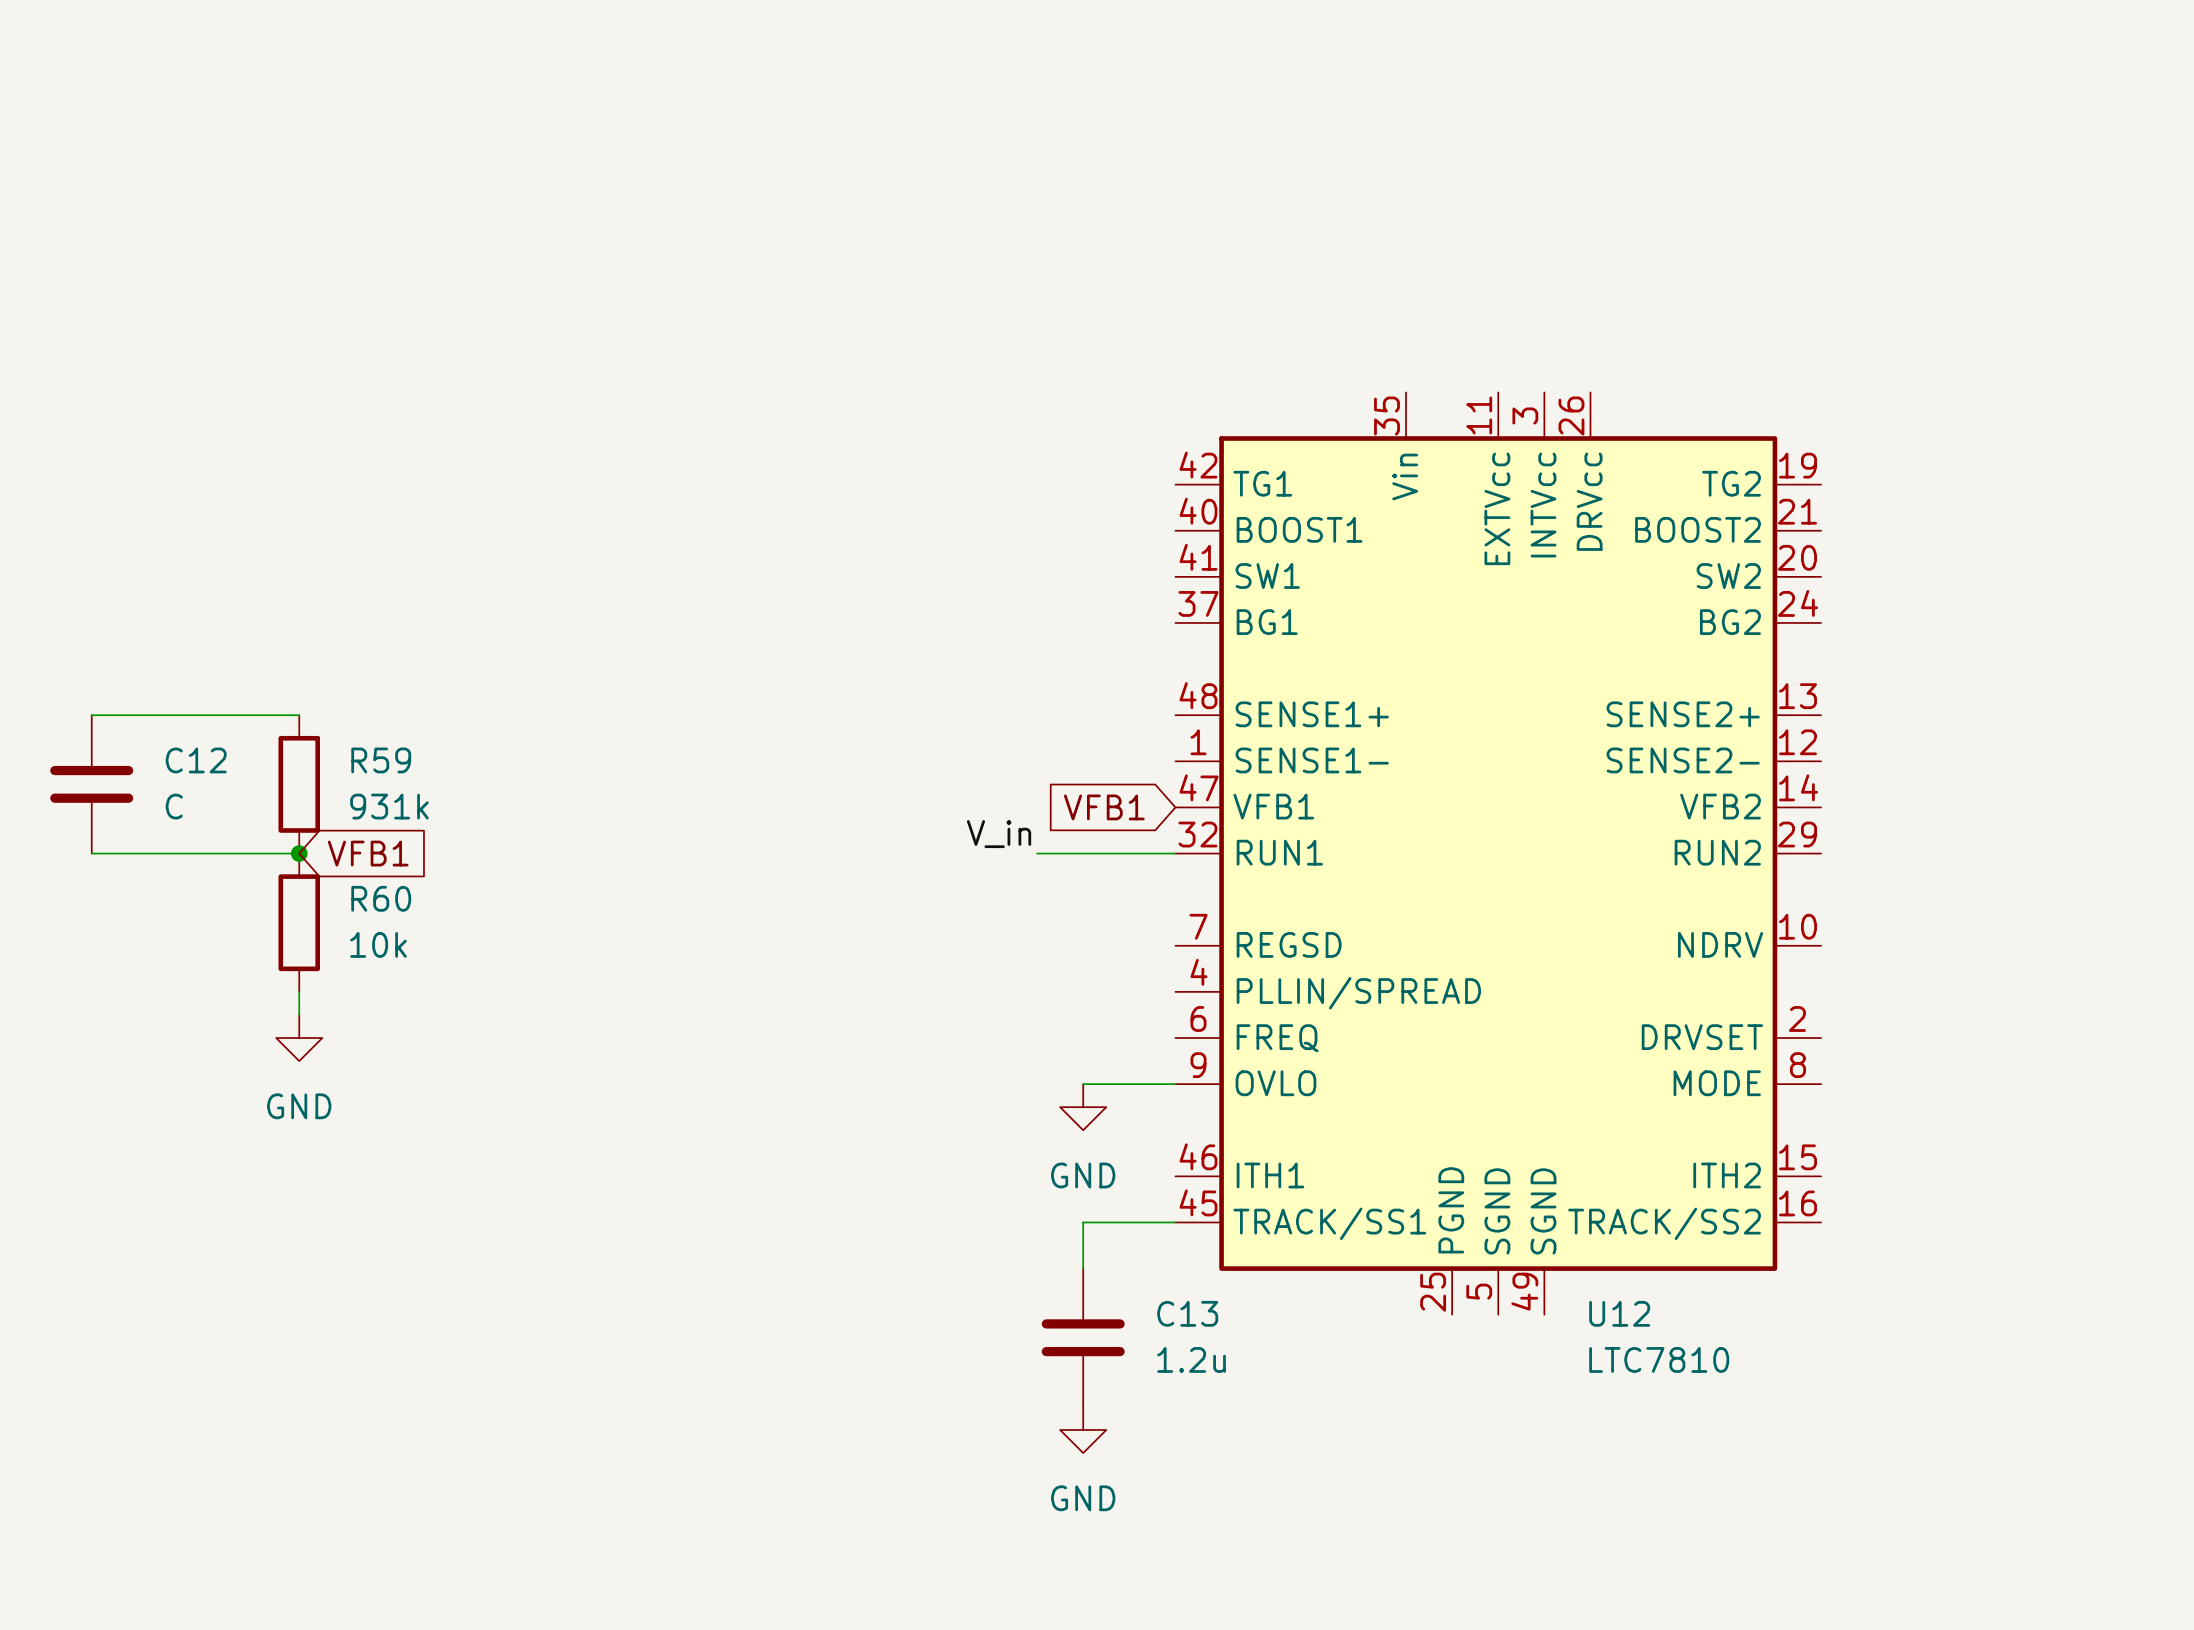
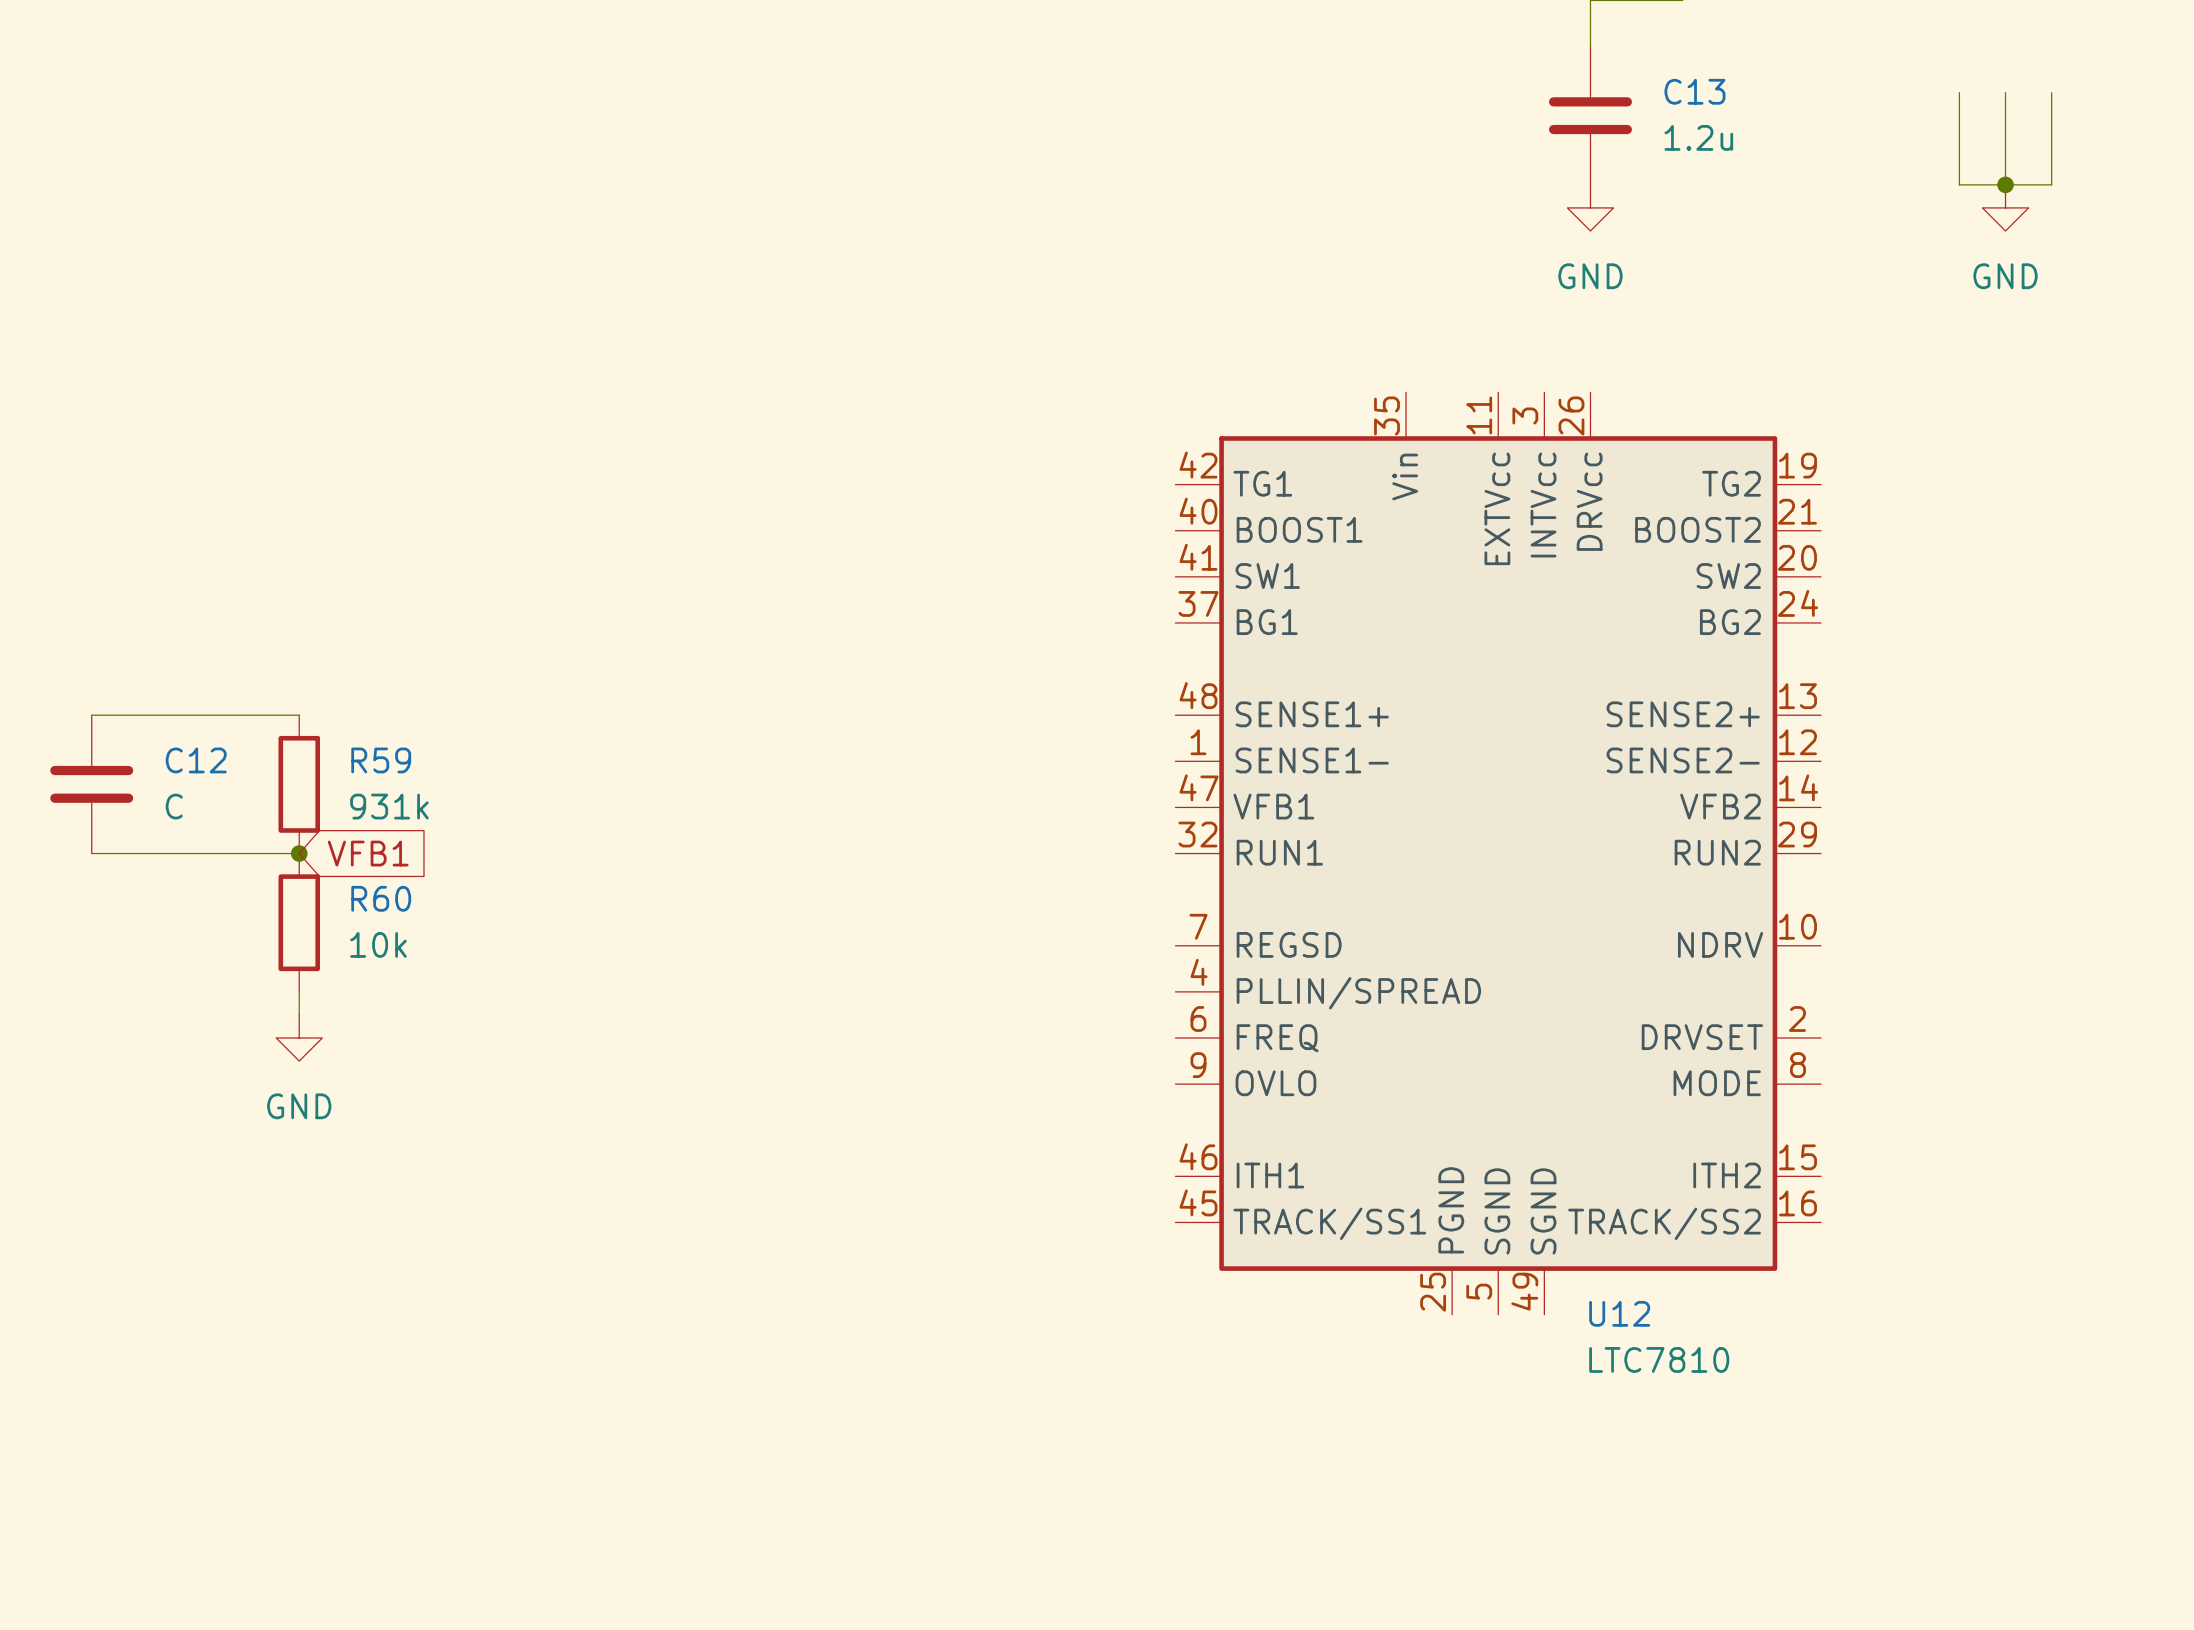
wire: none -> (1682, 0) (1590, 0) (1590, 46)
wire: none -> (1959, 92) (1959, 184) (2051, 184) (2051, 92)
wire: none -> (2005, 92) (2005, 184)
junction: none -> (2005, 184)
power symbol: none -> GND (1590, 207)
power symbol: none -> GND (2005, 207)
global label: VFB1 (1104, 807) -> none
label: V_in (999, 834) -> none
wire: (1037, 853) (1175, 853) -> none
wire: (1083, 1084) (1175, 1084) -> none
power symbol: GND (1083, 1107) -> none
wire: (1175, 1222) (1083, 1222) (1083, 1268) -> none
C13 position: (1083, 1337) -> (1590, 115)
power symbol: GND (1083, 1429) -> none

